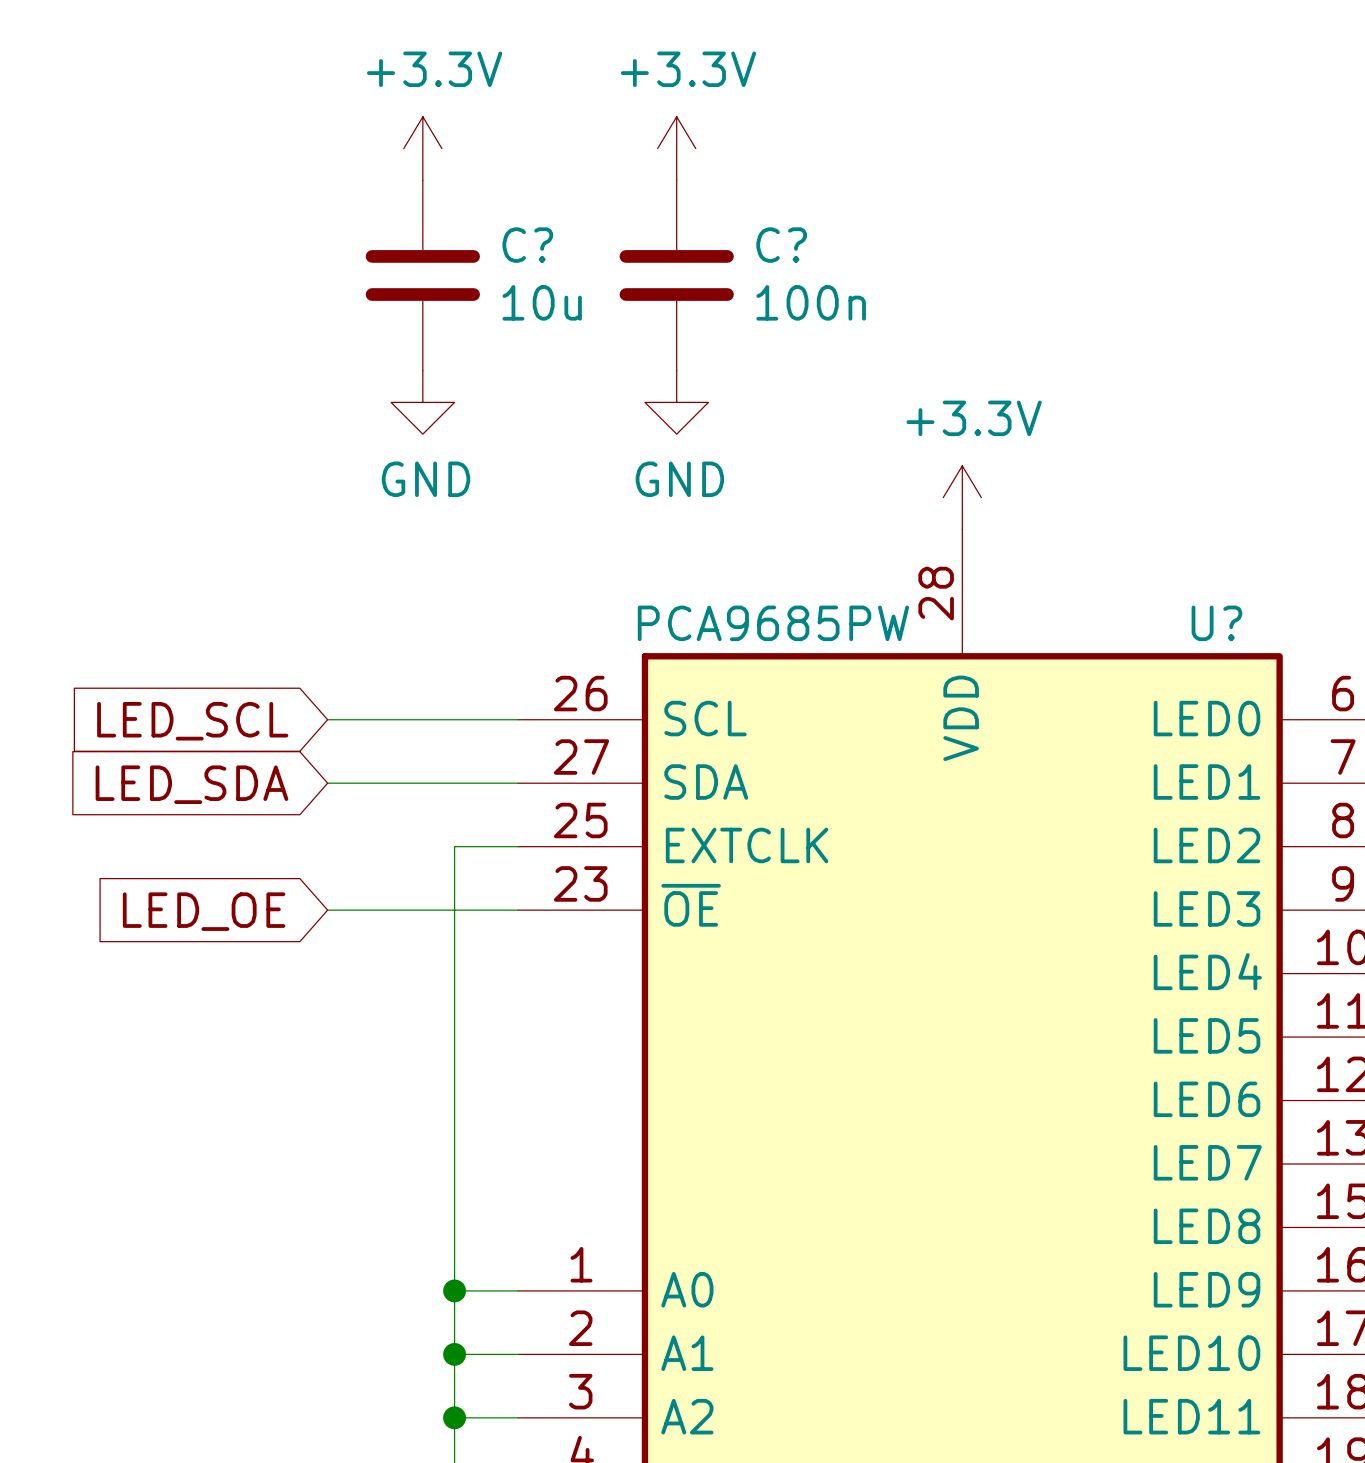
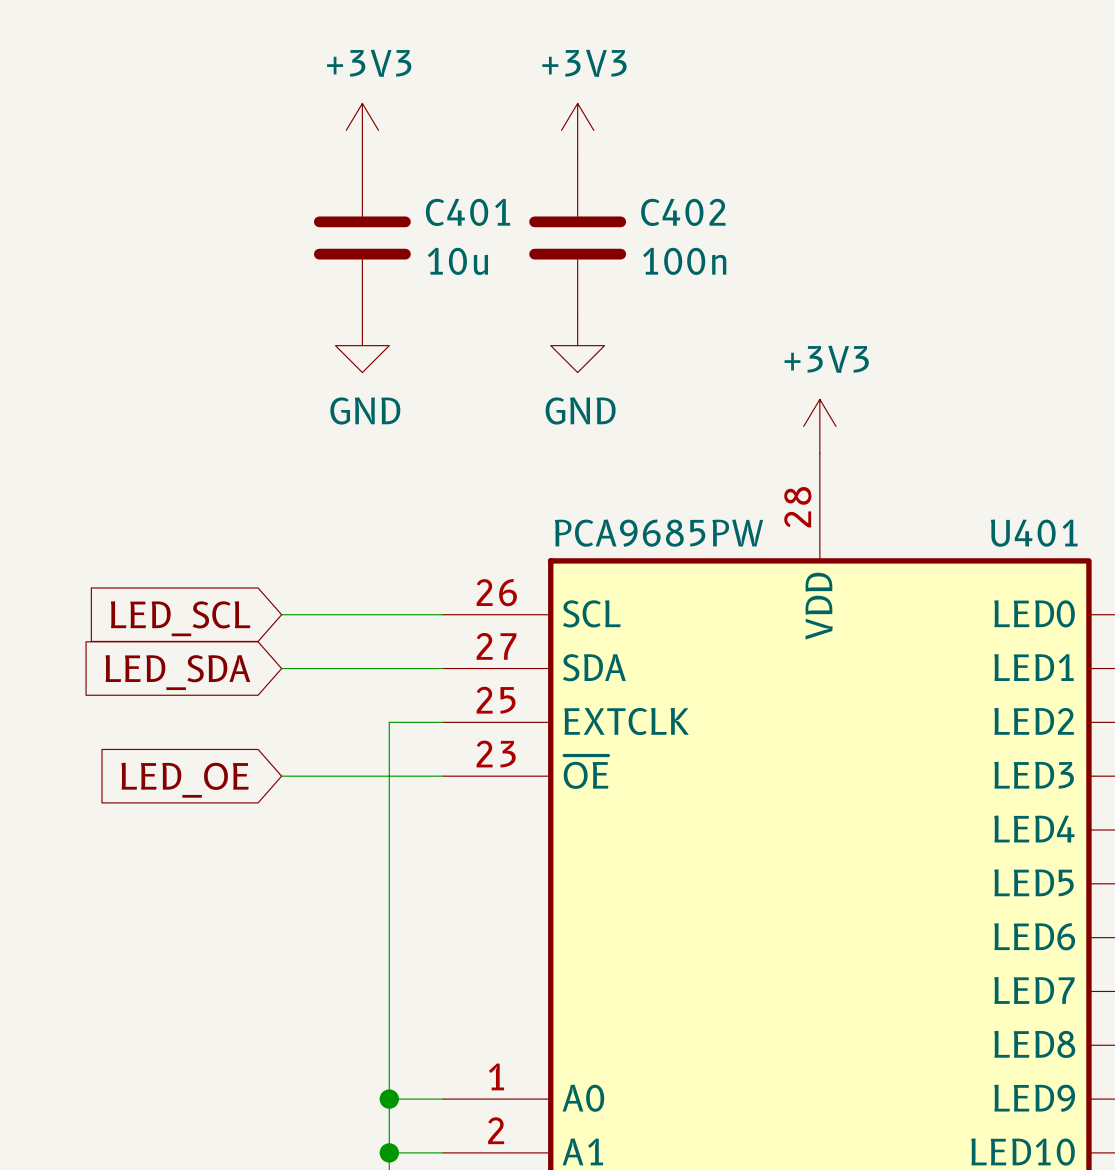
power symbol: +3.3V (422, 148) -> +3V3 (362, 130)
power symbol: +3.3V (676, 148) -> +3V3 (577, 130)
C? name: C? (527, 245) -> C401 (468, 212)
C? name: C? (781, 245) -> C402 (683, 212)
power symbol: +3.3V (962, 497) -> +3V3 (819, 426)
U? name: U? (1216, 623) -> U401 (1034, 533)

